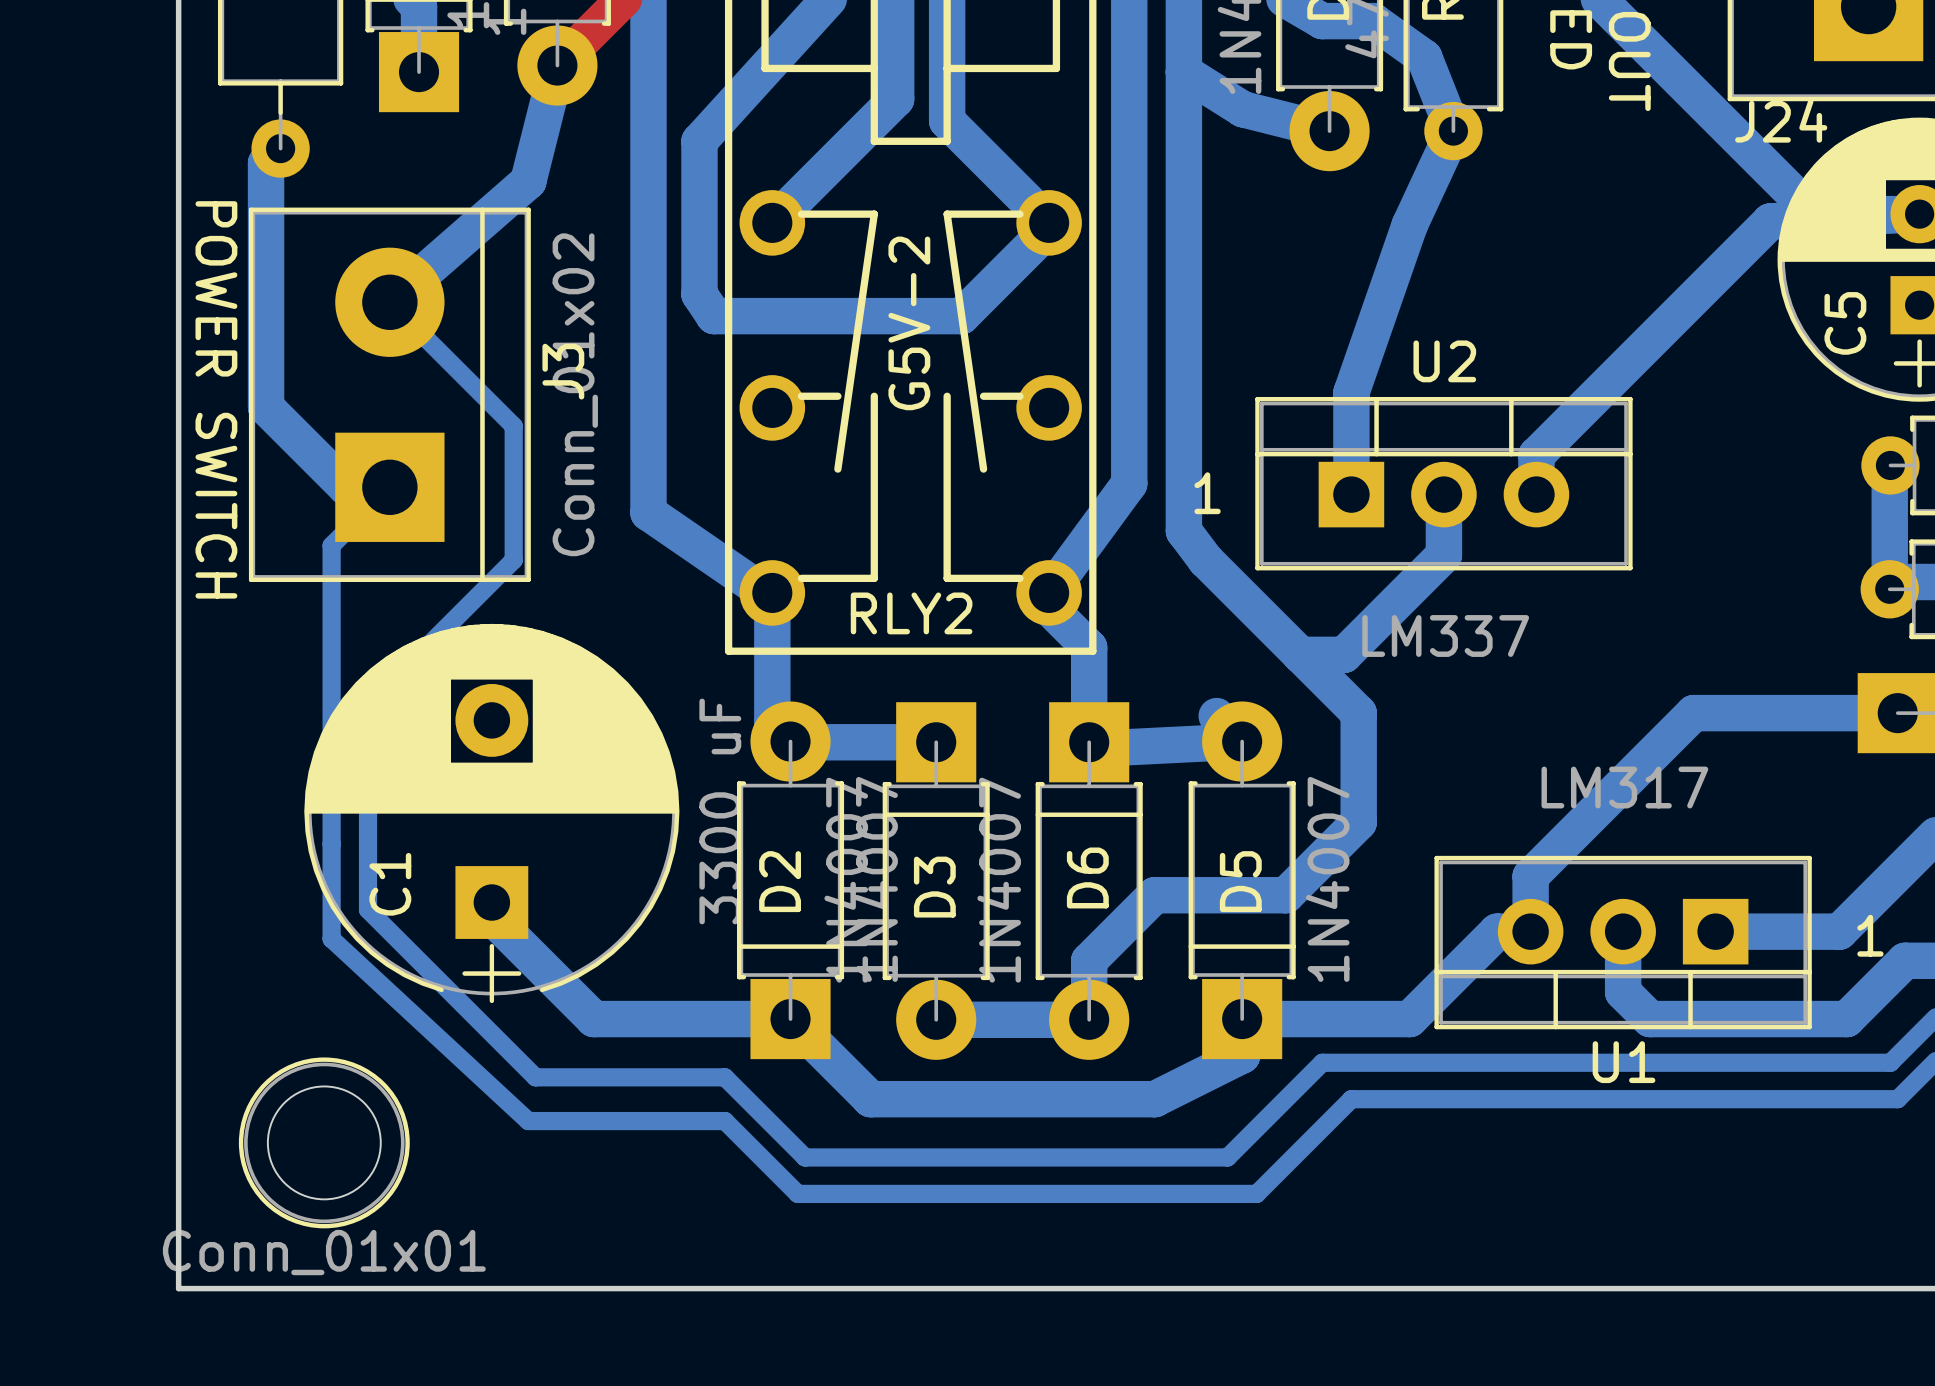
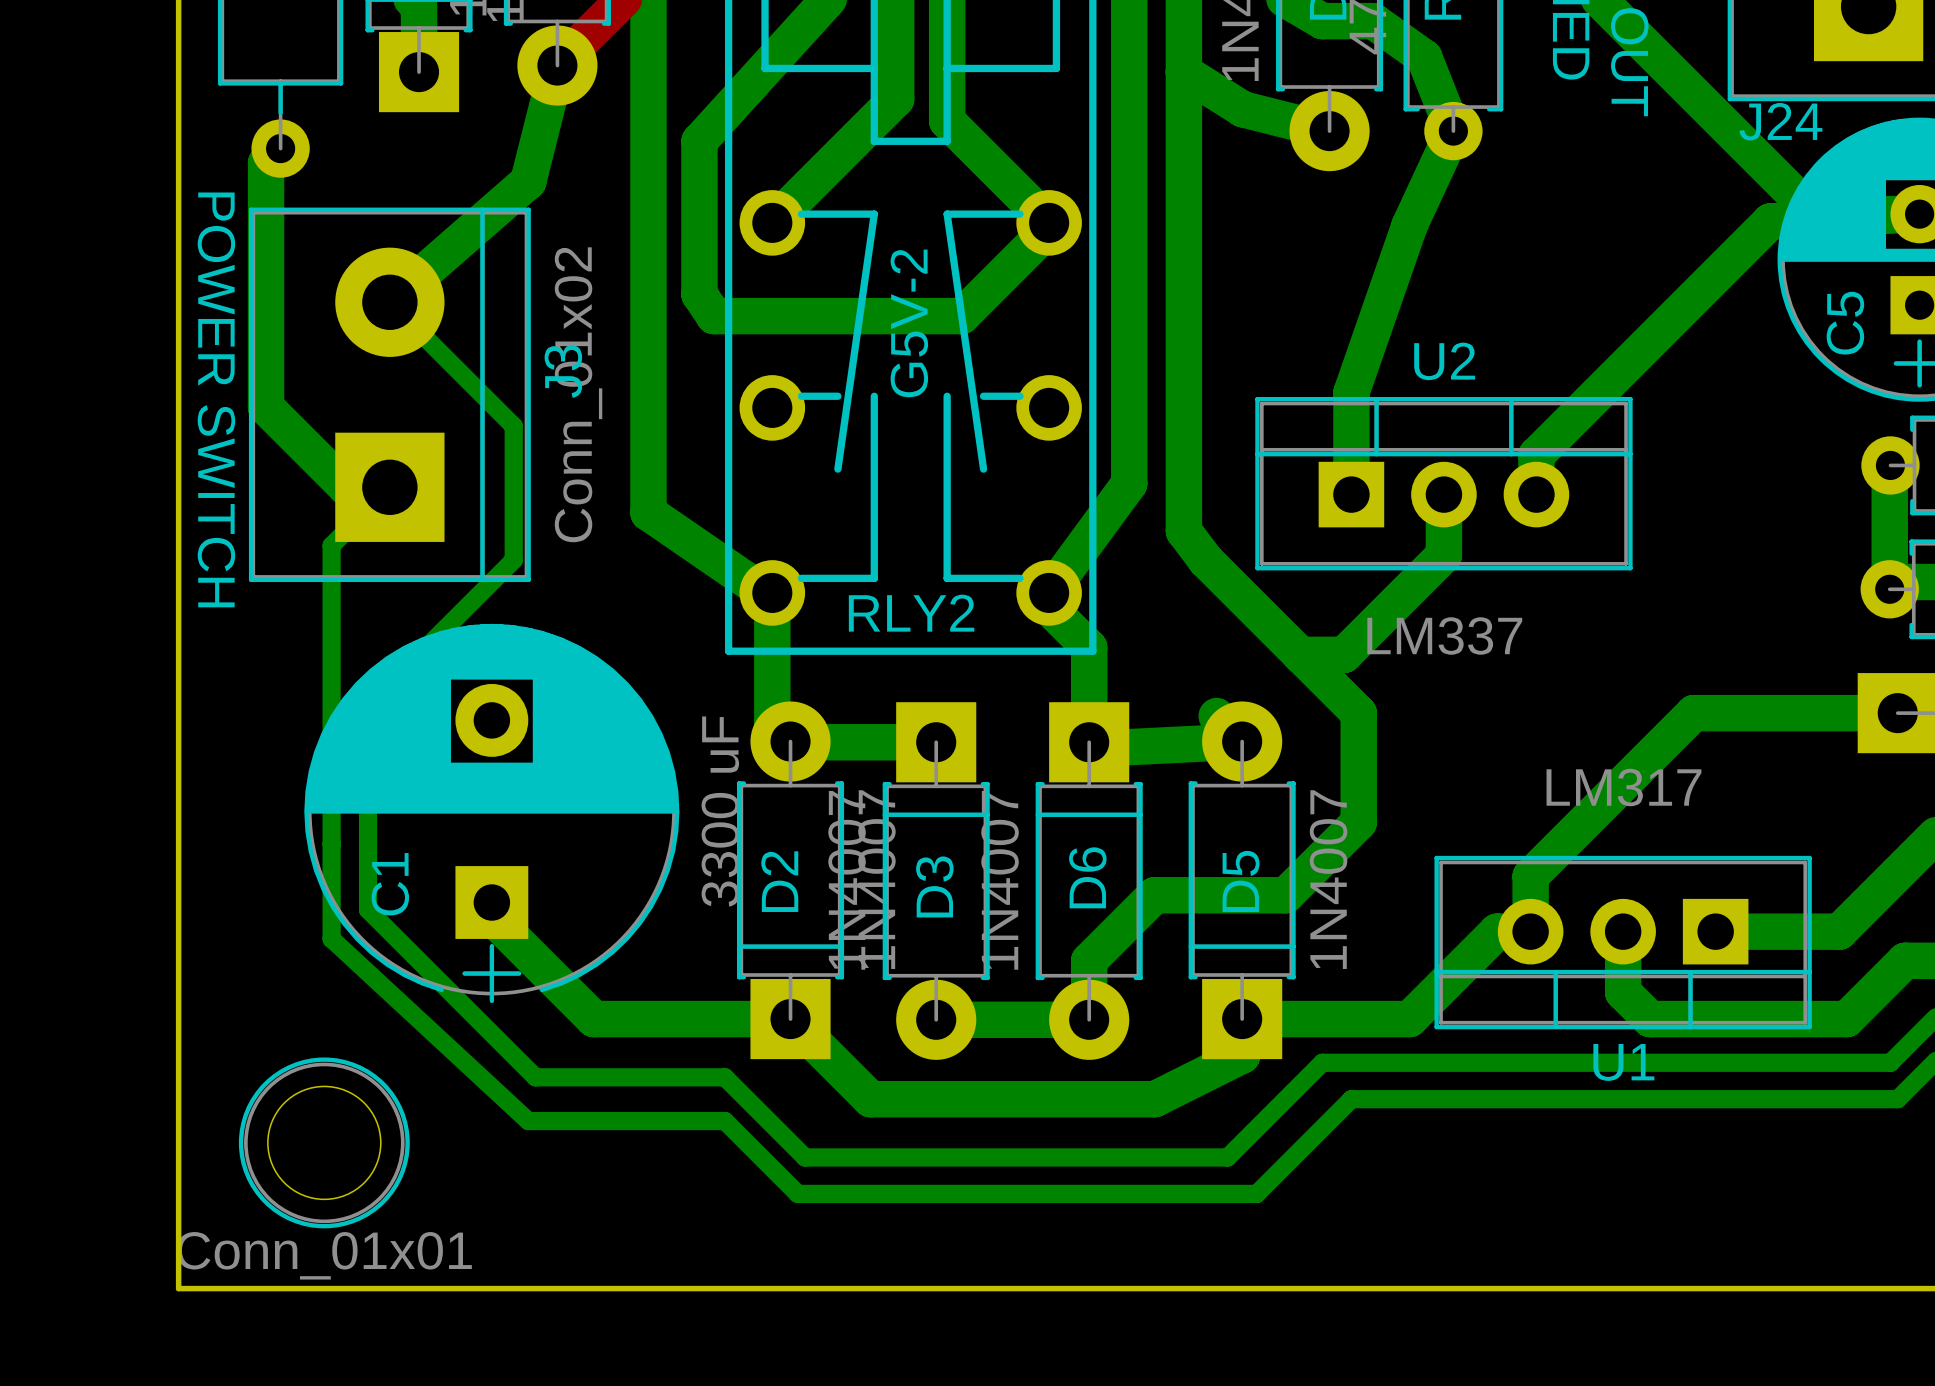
text: 1 (1207, 493) -> none
text: 1 (1870, 935) -> none

